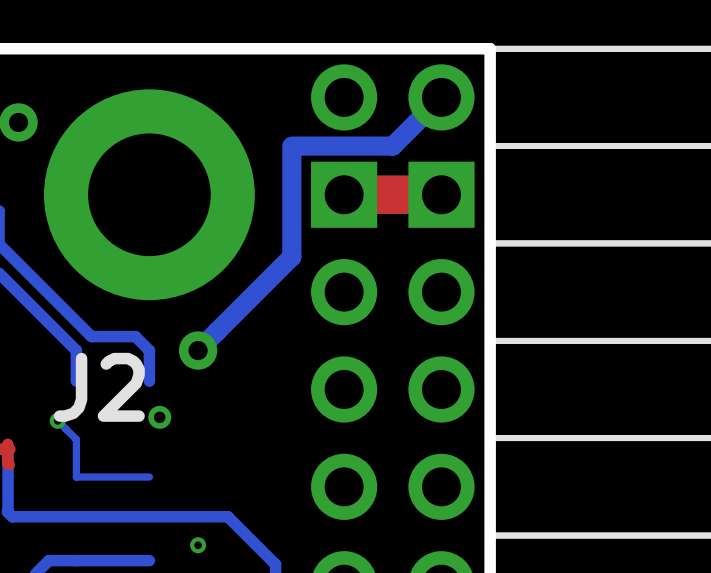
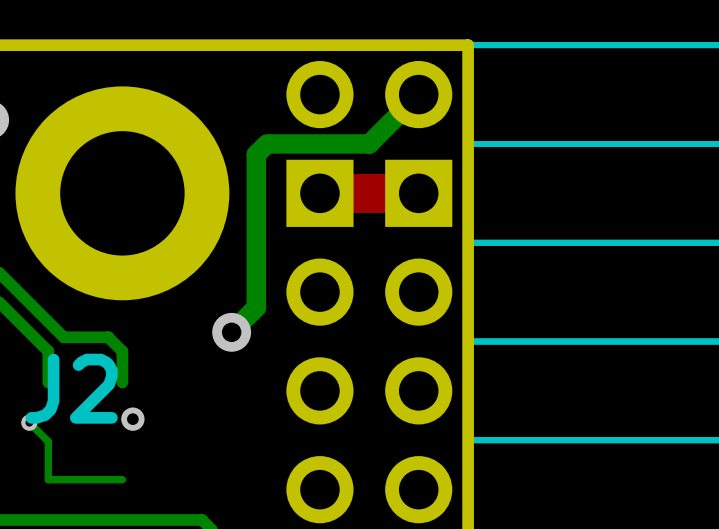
bottom track: (291, 146) (291, 256) (198, 350) -> (266, 143) (256, 154) (256, 307) (231, 332)
via position: (198, 350) -> (231, 332)

